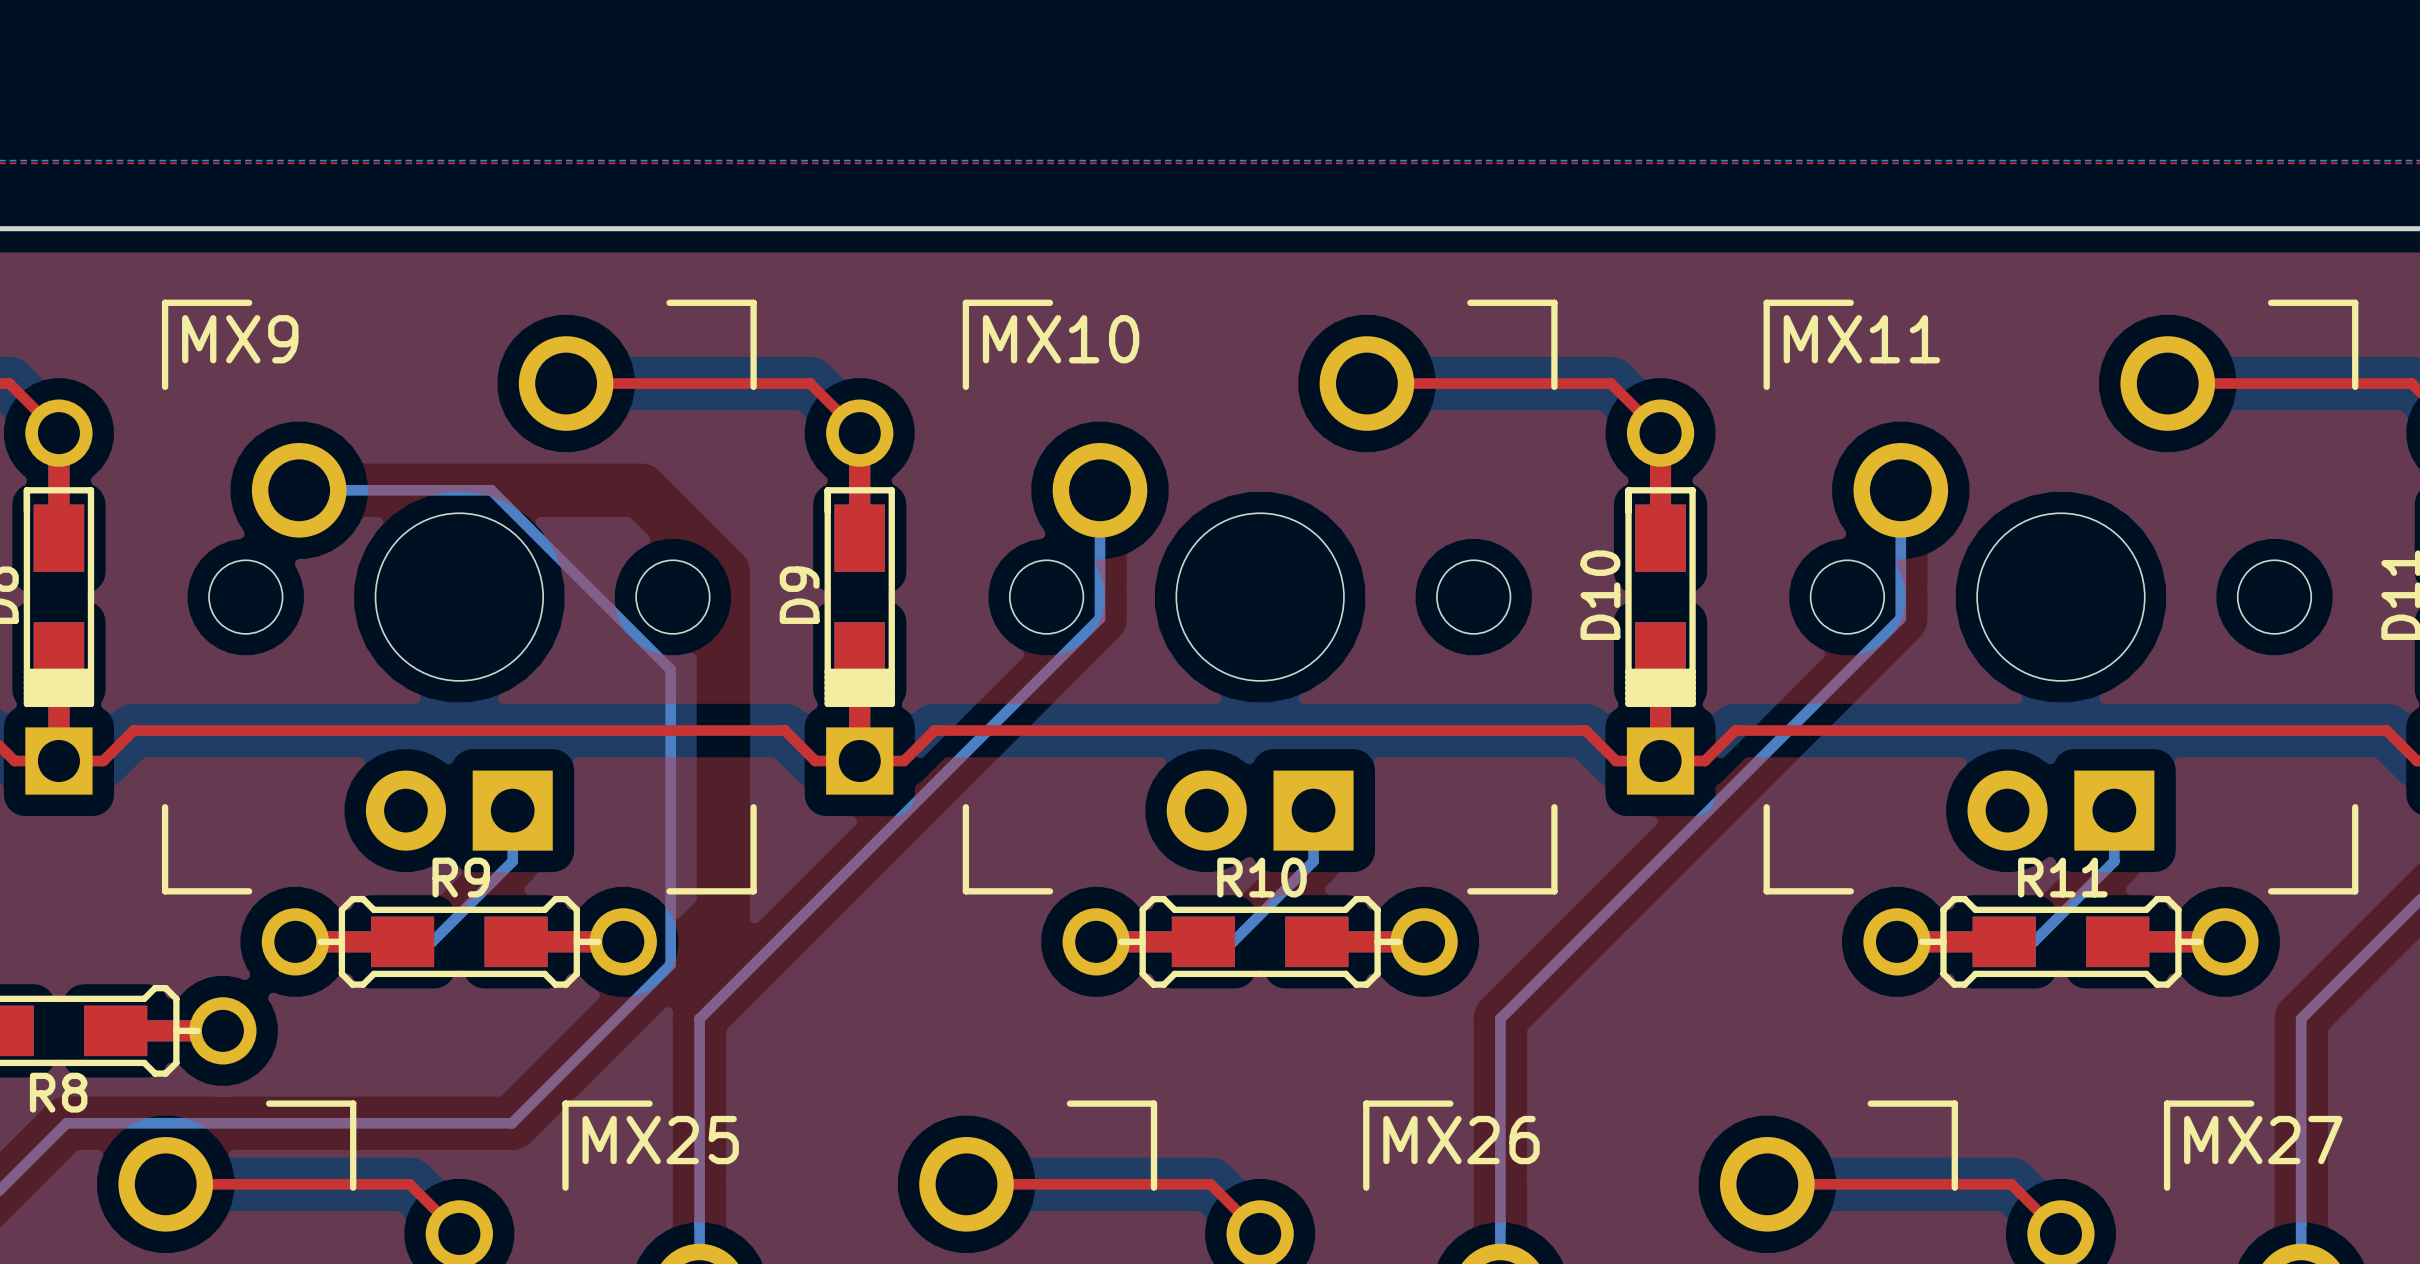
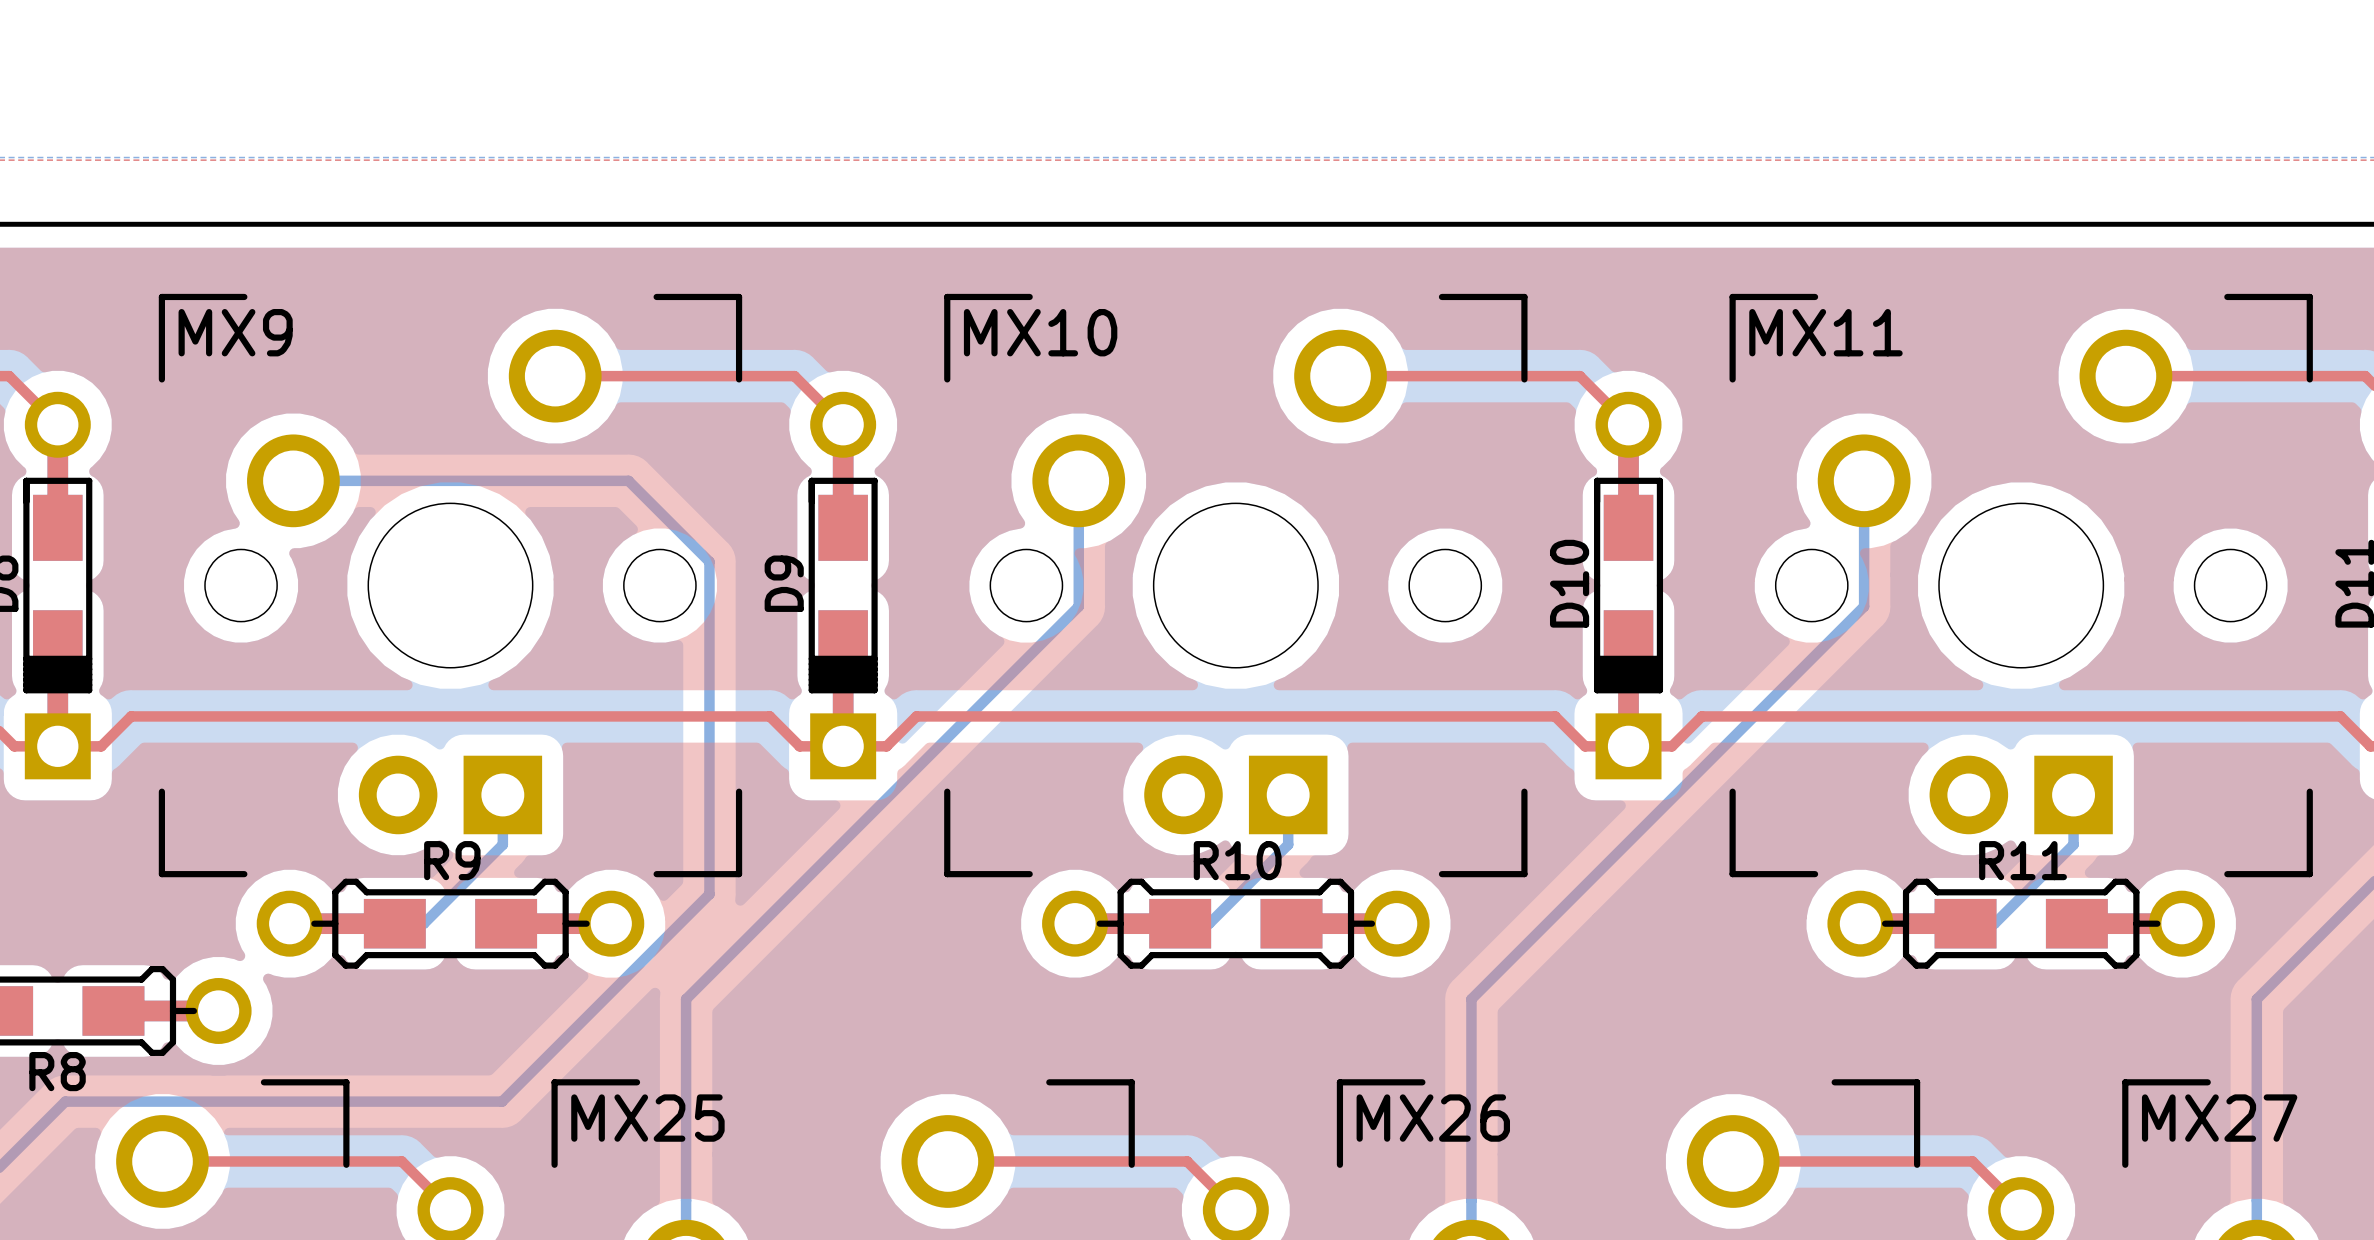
bottom track: (491, 490) (670, 669) (670, 964) -> (481, 480) (628, 480) (709, 561) (709, 894) (657, 945)

